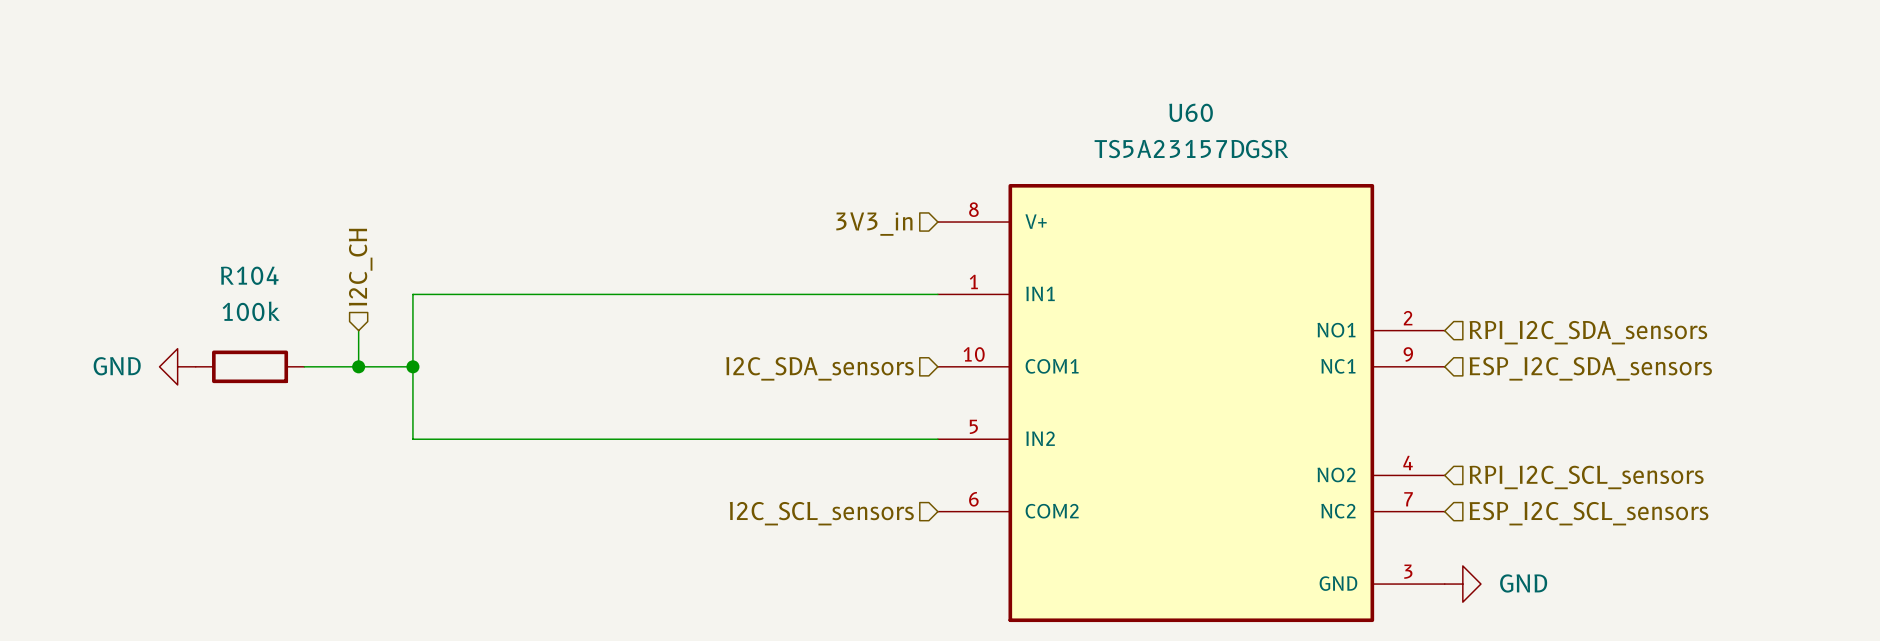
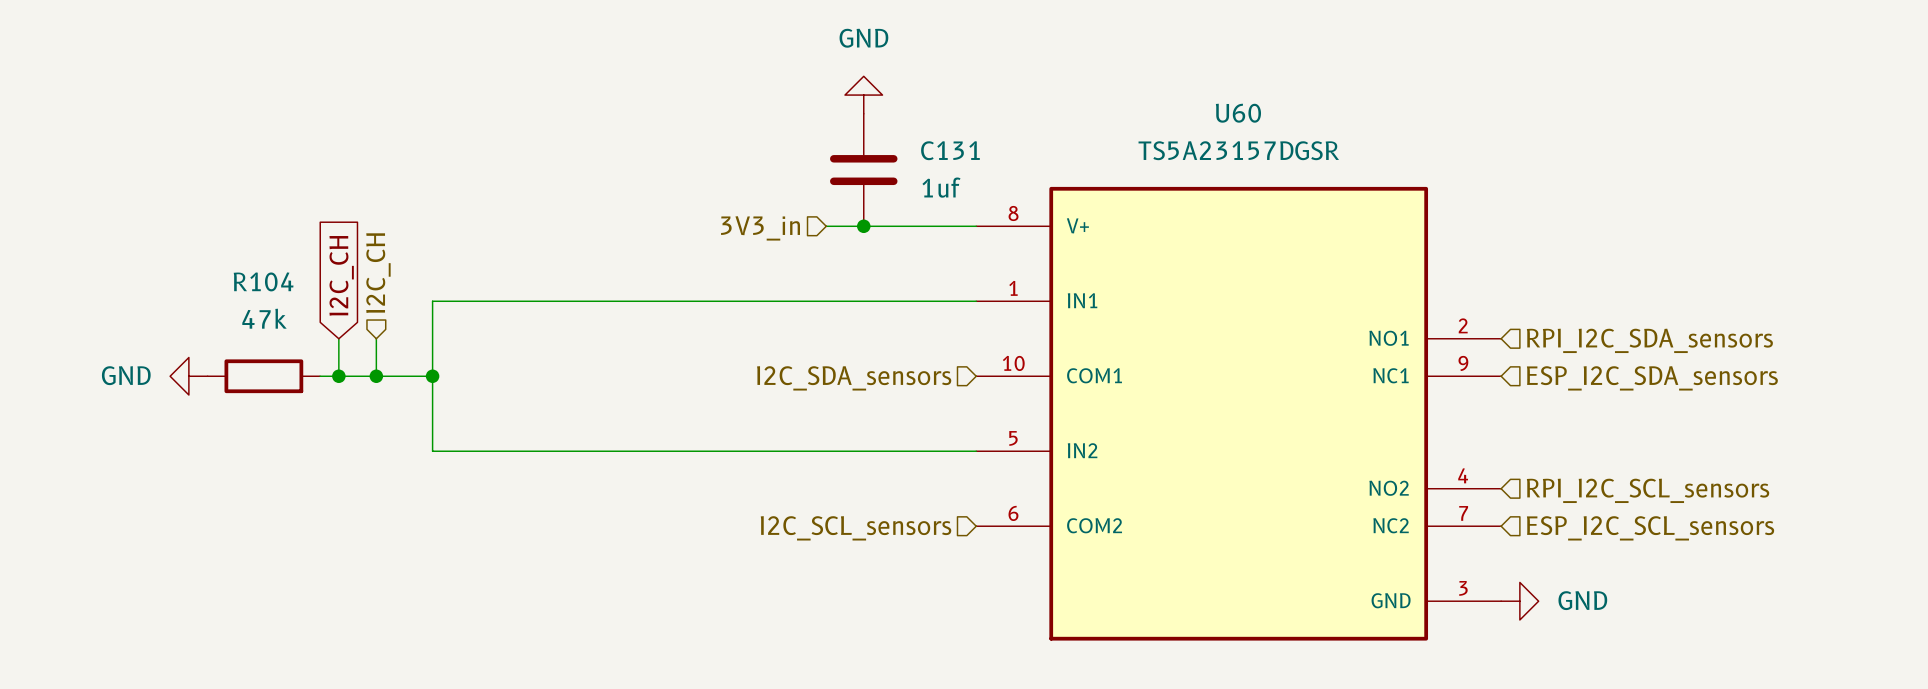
power symbol: none -> GND (863, 95)
C131: none -> 1uf (863, 170)
wire: none -> (826, 226) (976, 226)
junction: none -> (863, 226)
hierarchical label position: 3V3_in (874, 224) -> 3V3_in (760, 228)
global label: none -> I2C_CH (341, 275)
R104 value: 100k (251, 311) -> 47k (264, 318)
wire: none -> (338, 338) (338, 376)
junction: none -> (338, 376)

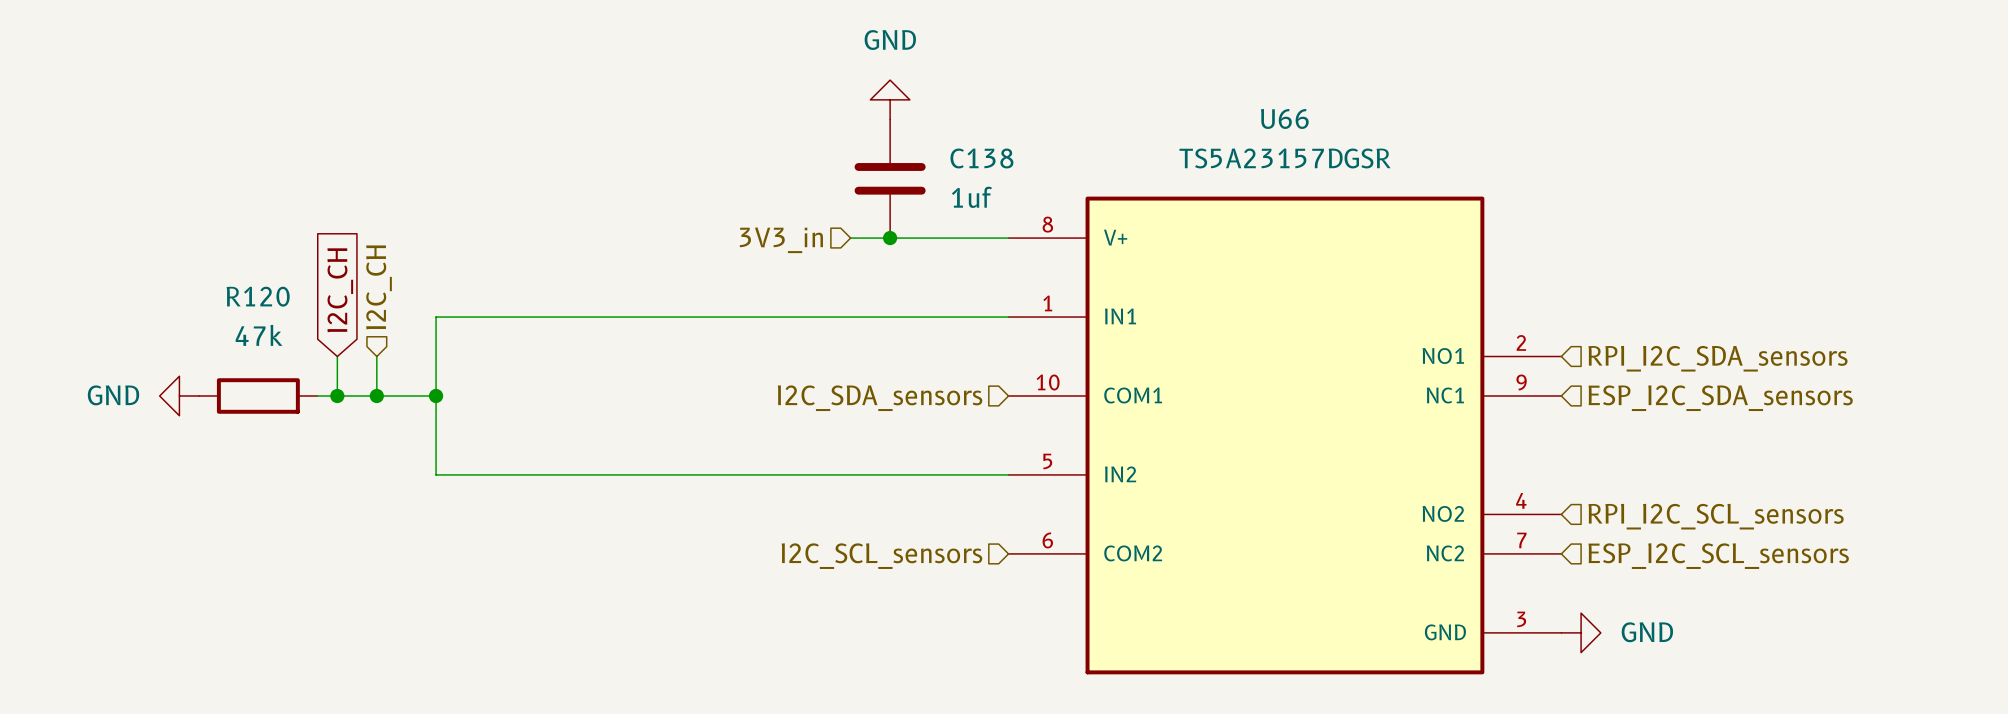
U60 name: U60 (1238, 113) -> U66 (1284, 118)
C131 name: C131 (950, 150) -> C138 (981, 158)
R104 name: R104 (263, 281) -> R120 (258, 296)

